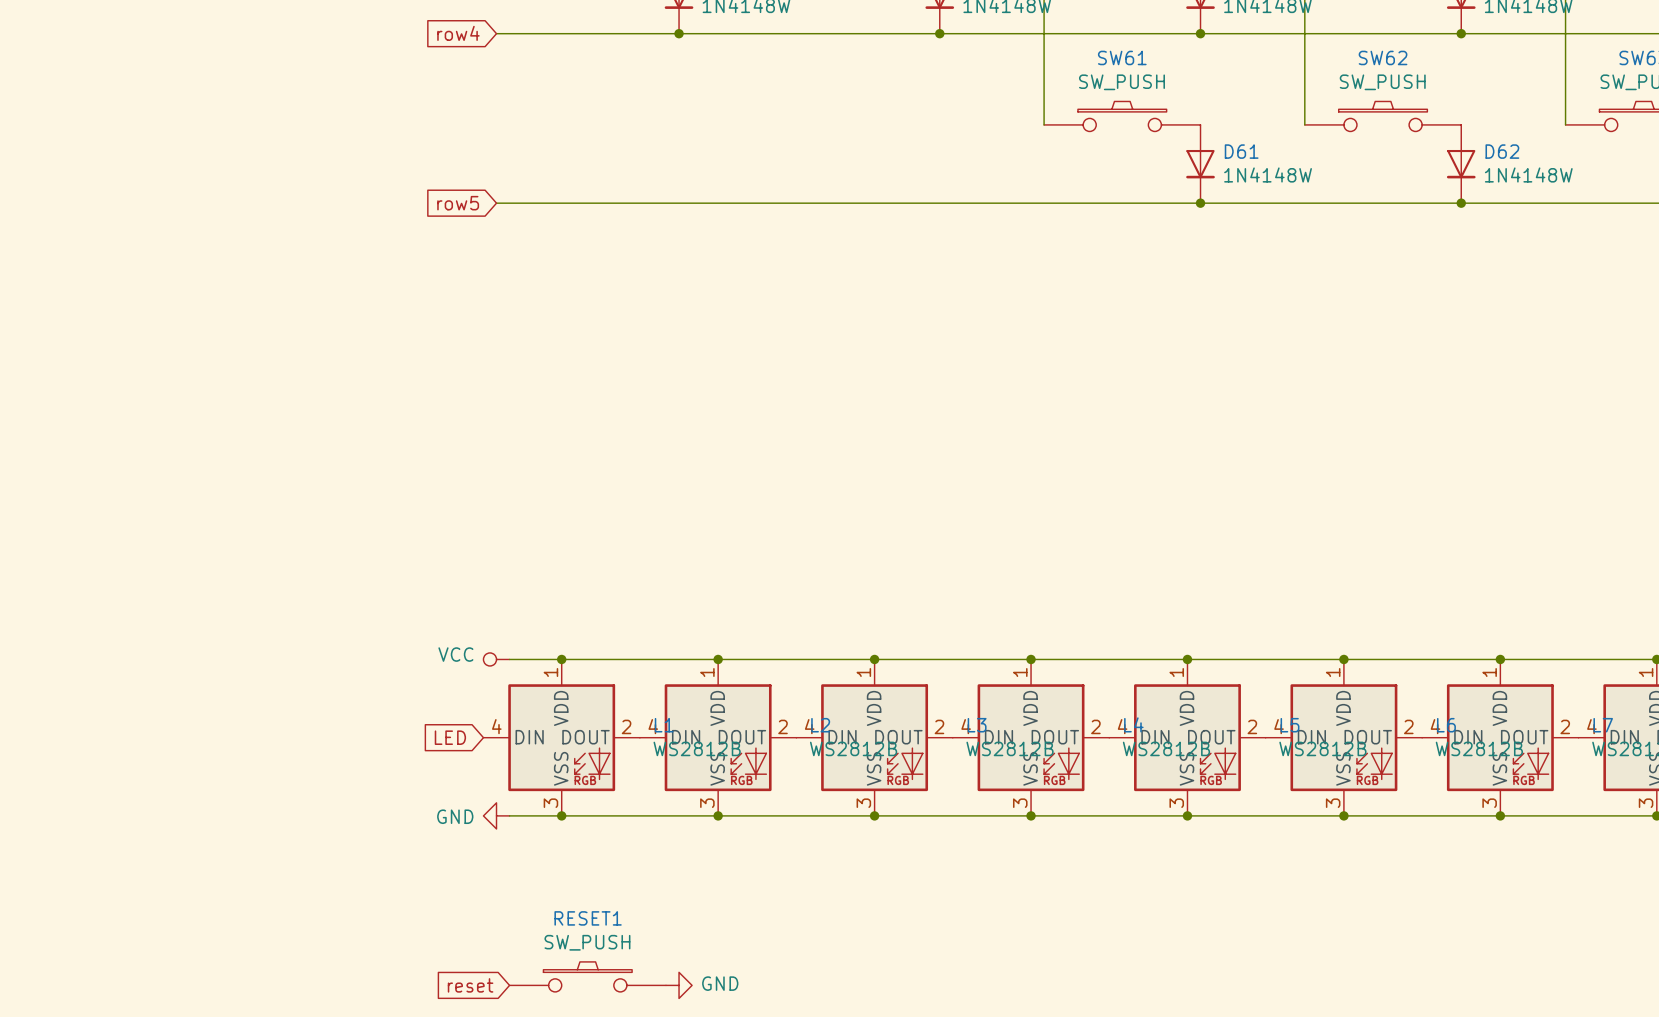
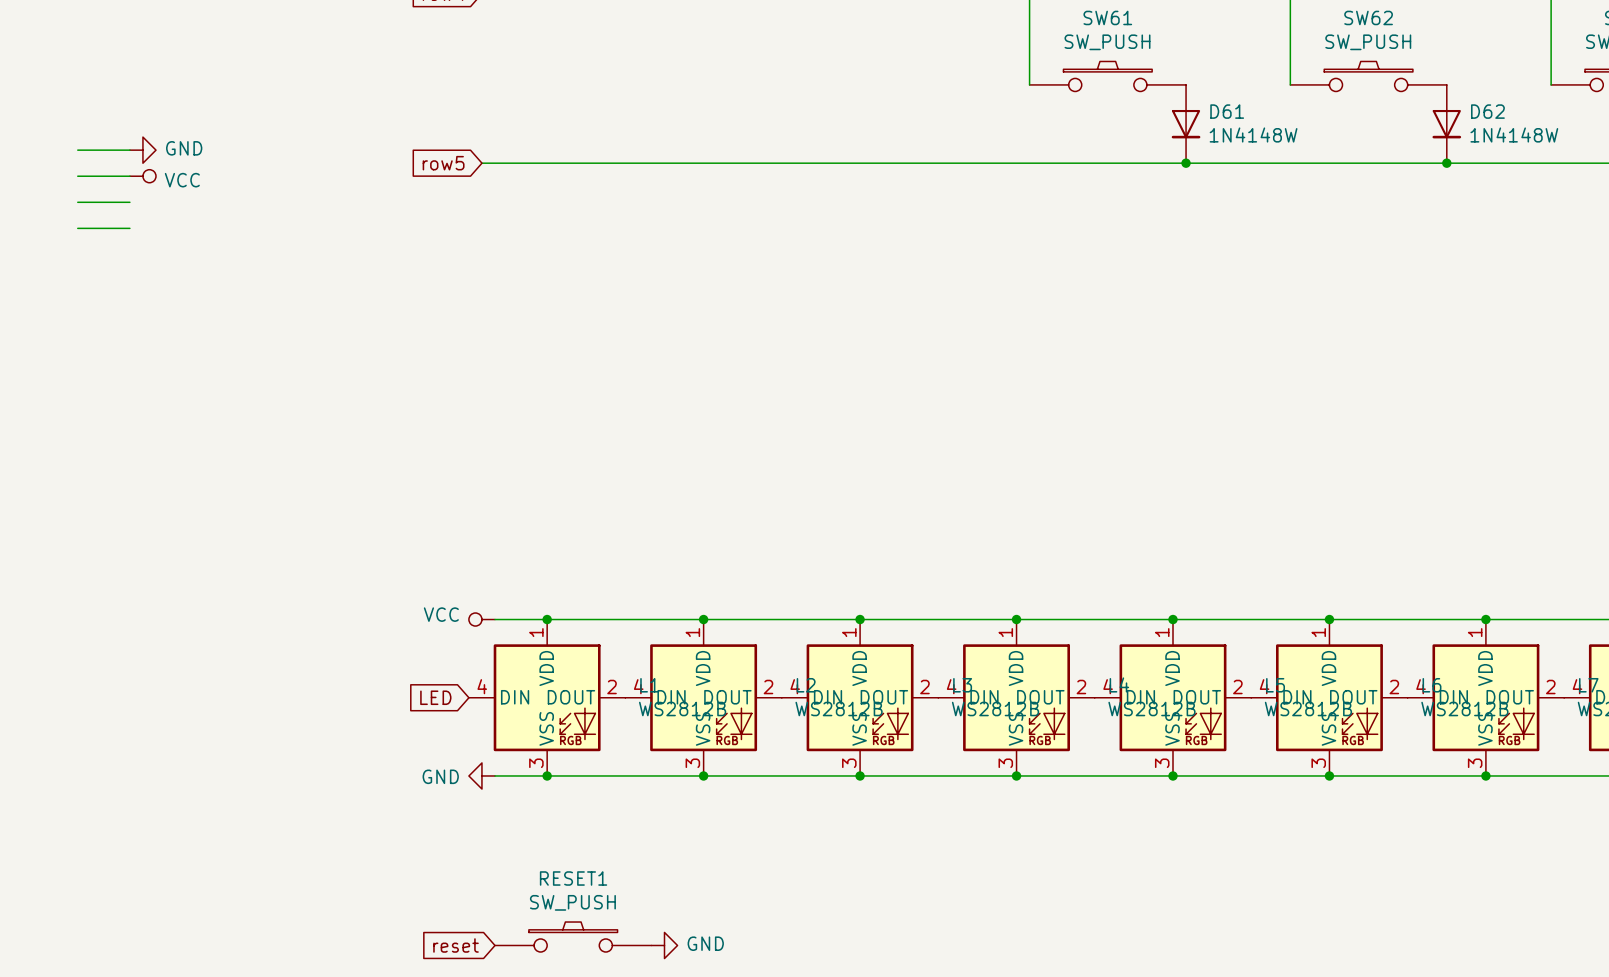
wire: none -> (77, 150) (129, 150)
power symbol: none -> GND (142, 150)
wire: none -> (77, 176) (129, 176)
power symbol: none -> VCC (142, 176)
wire: none -> (77, 202) (129, 202)
wire: none -> (77, 228) (129, 228)

